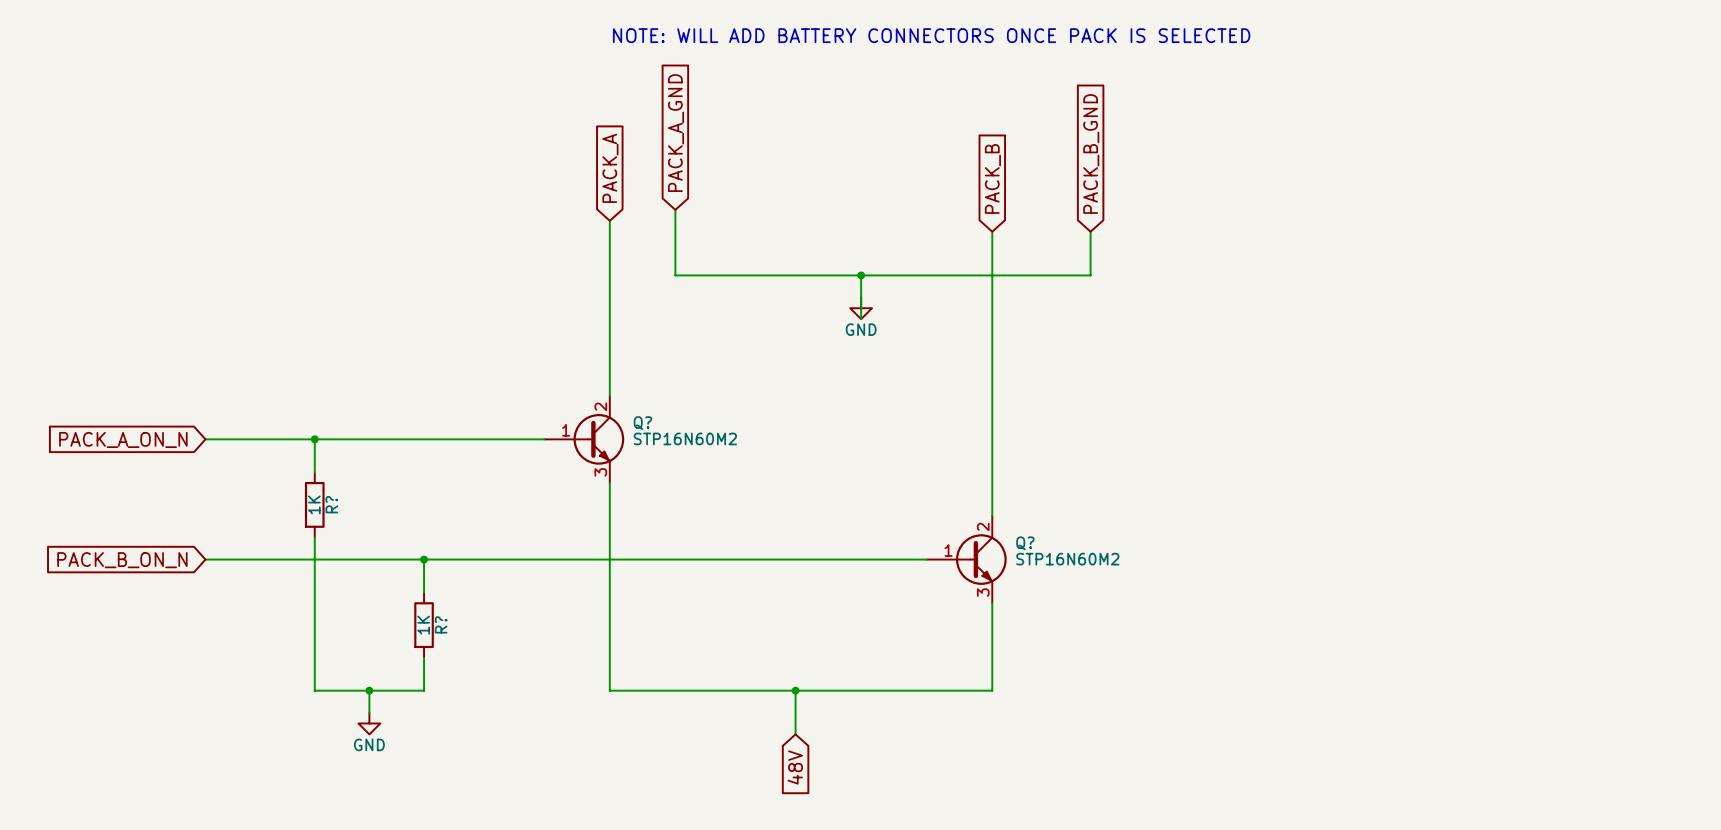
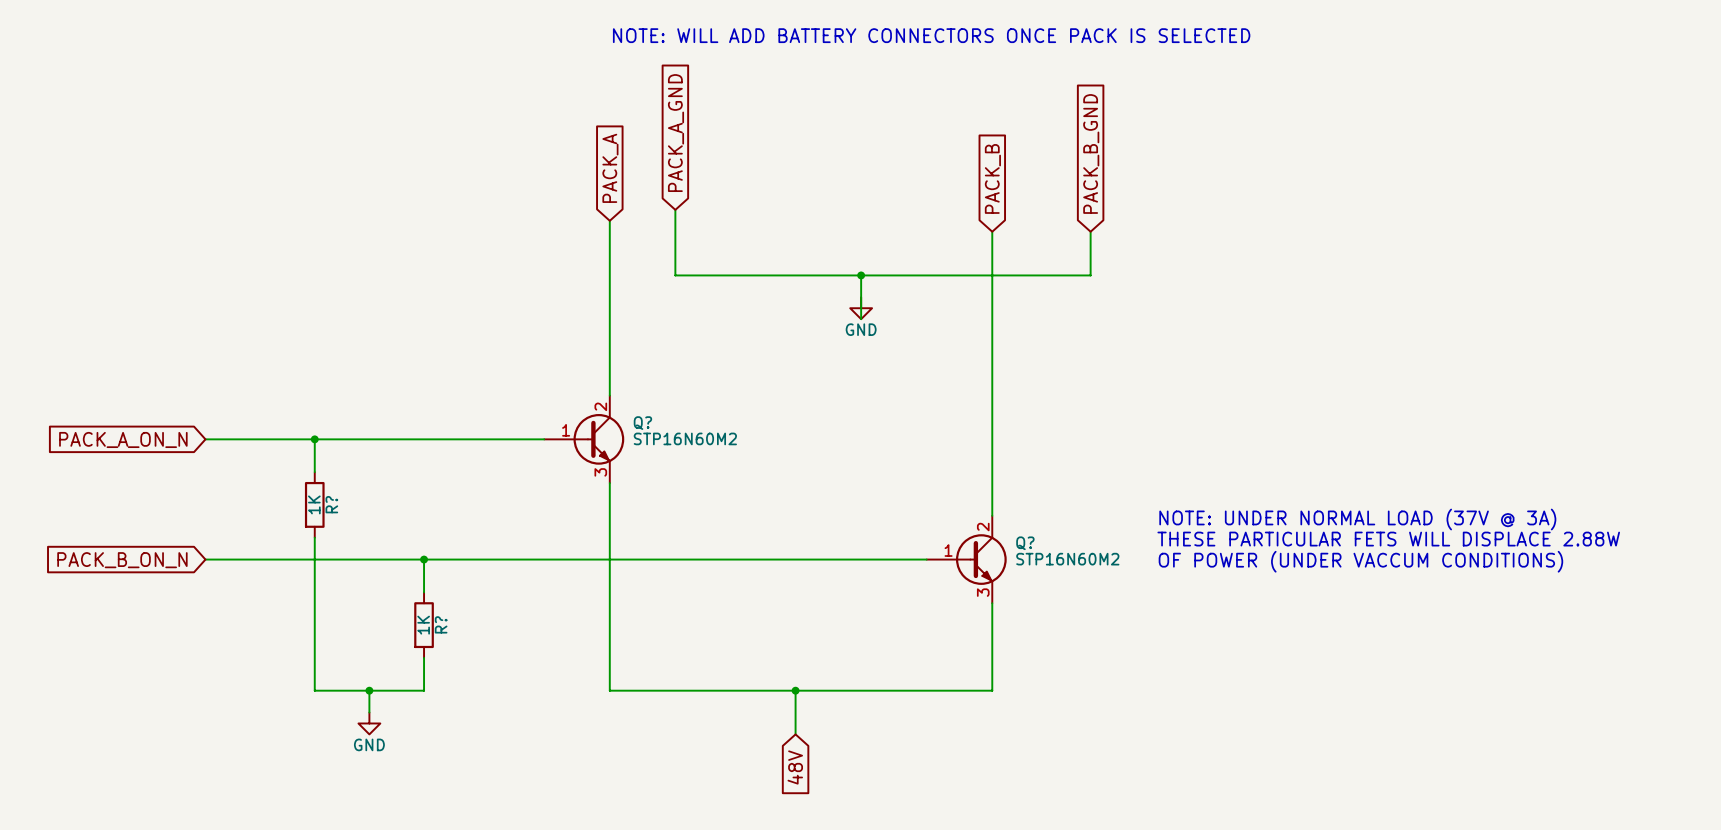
text: none -> NOTE: UNDER NORMAL LOAD (37V @ 3A) (1357, 519)
text: none -> THESE PARTICULAR FETS WILL DISPLACE 2.88W (1388, 539)
text: none -> OF POWER (UNDER VACCUM CONDITIONS) (1360, 561)

